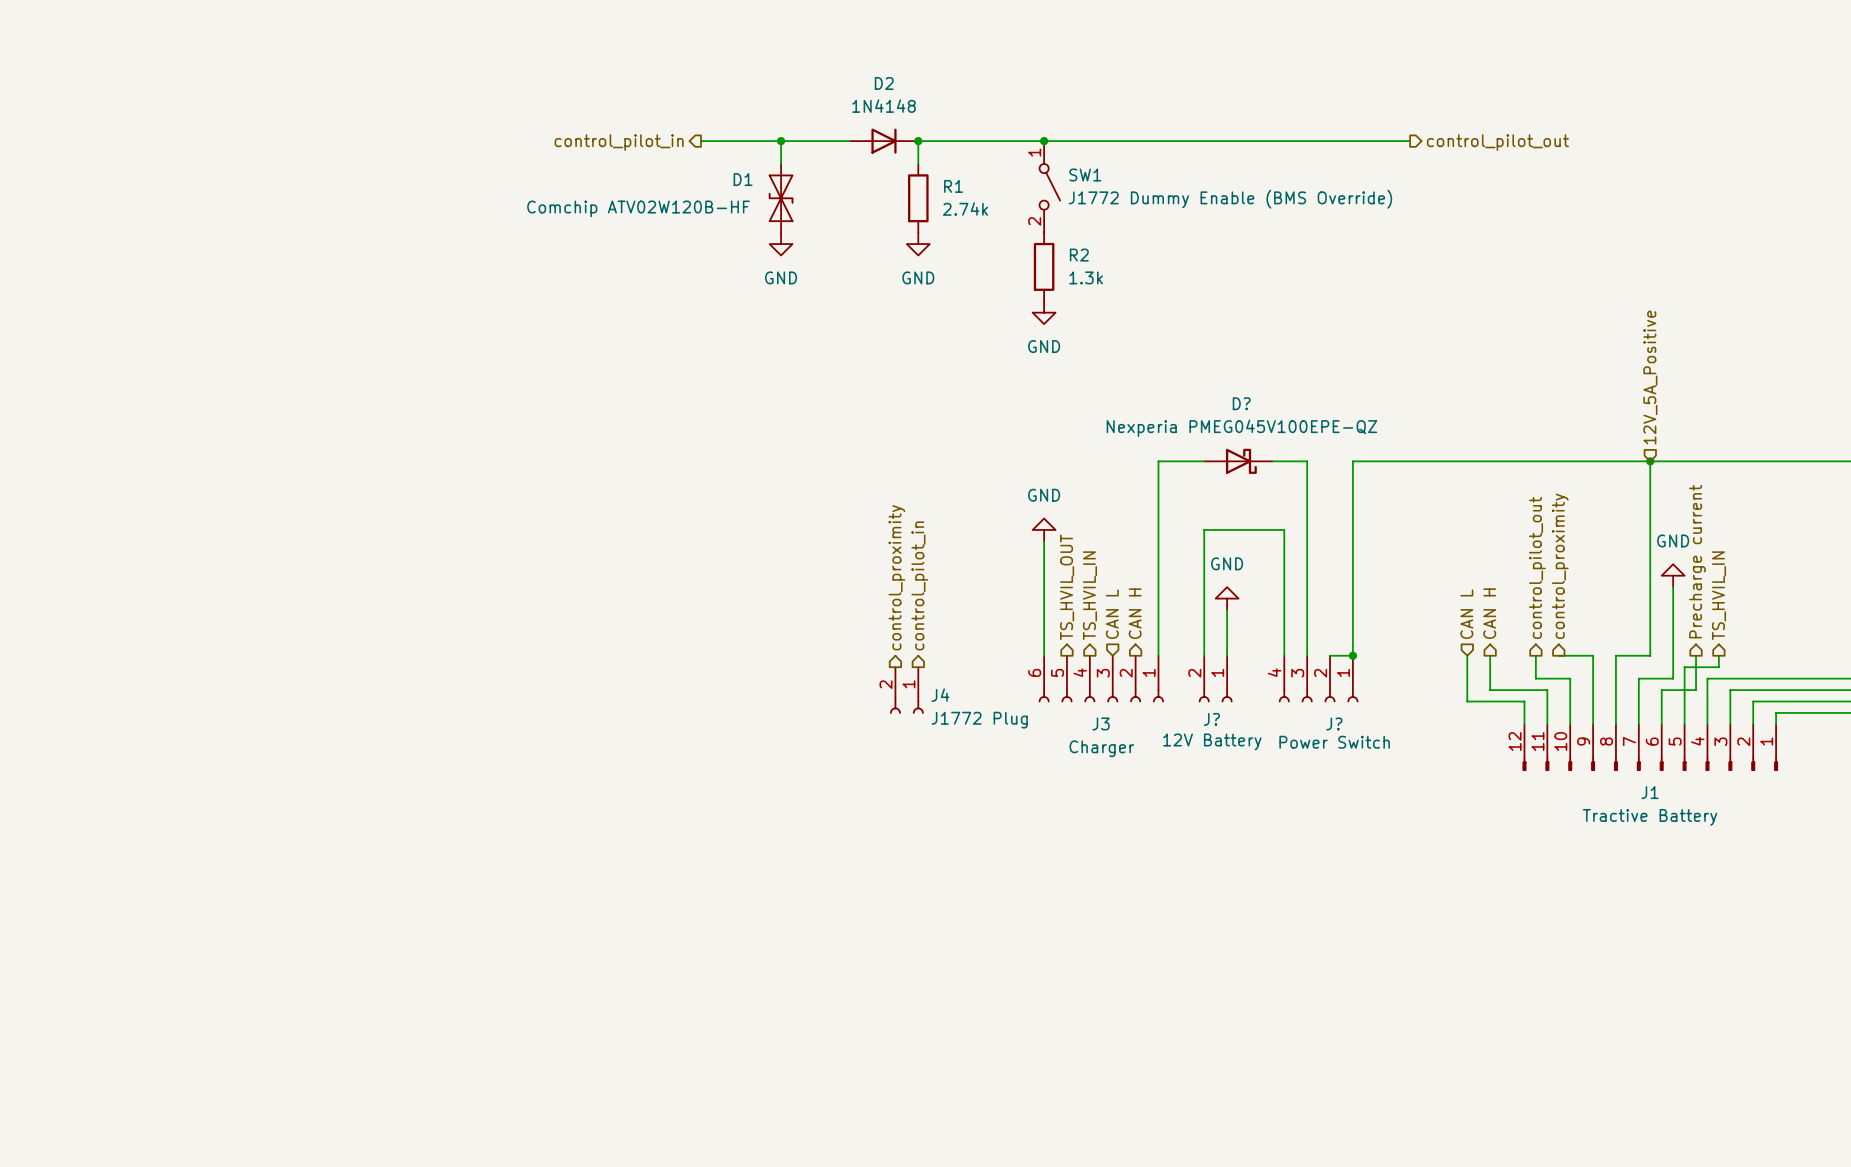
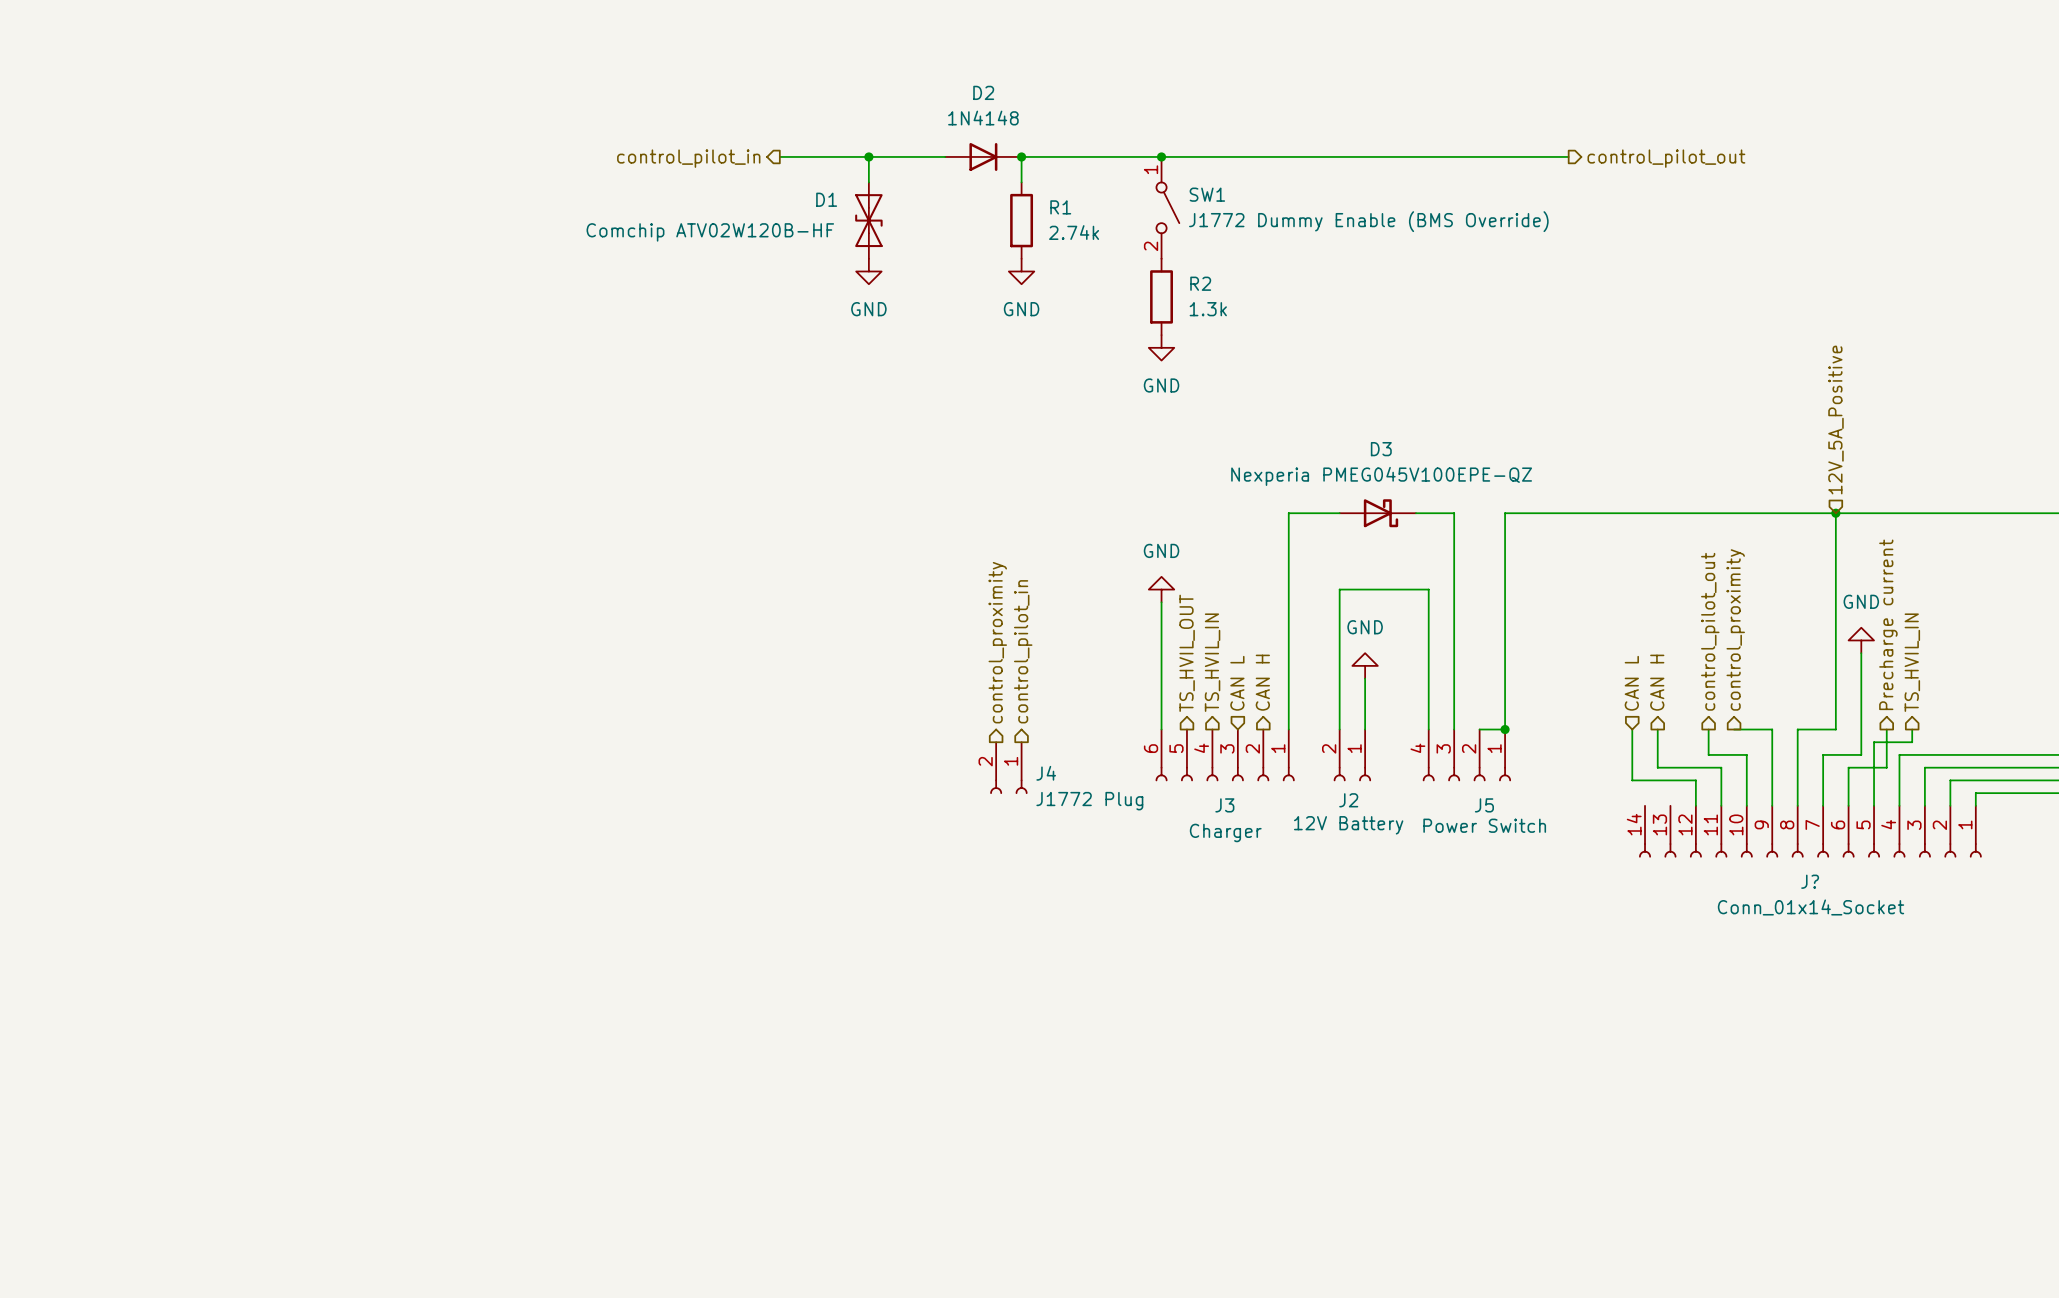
D? name: D? (1241, 403) -> D3 (1381, 449)
J? name: J? (1211, 719) -> J2 (1348, 800)
J? name: J? (1334, 723) -> J5 (1484, 805)
J?: none -> Conn_01x14_Socket (1810, 831)
J1: Tractive Battery (1650, 747) -> none

